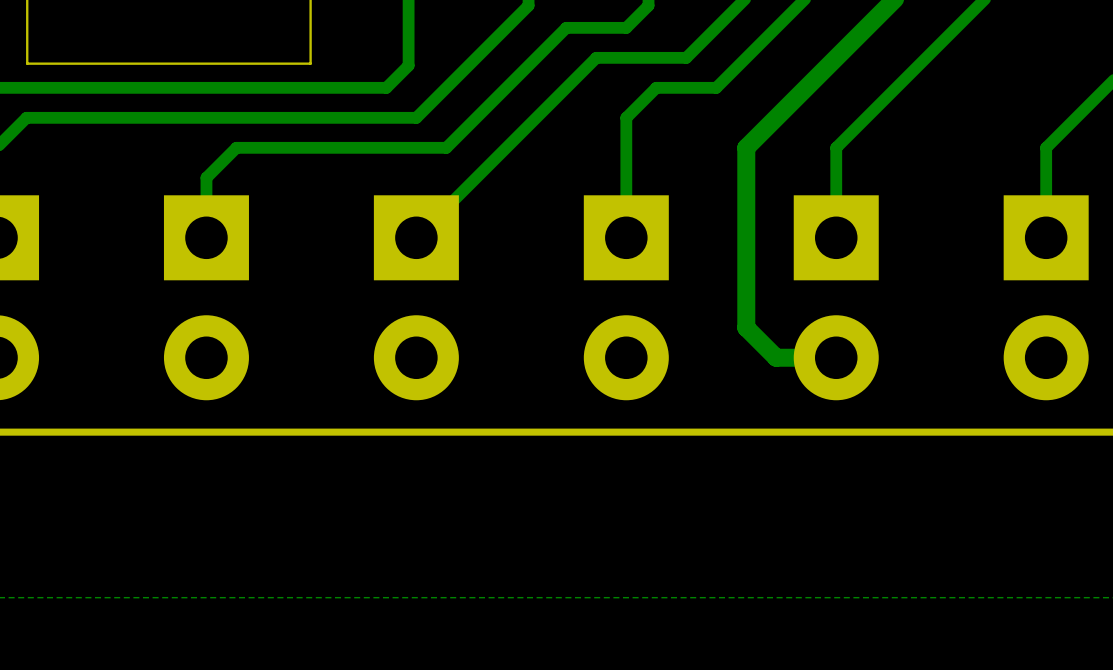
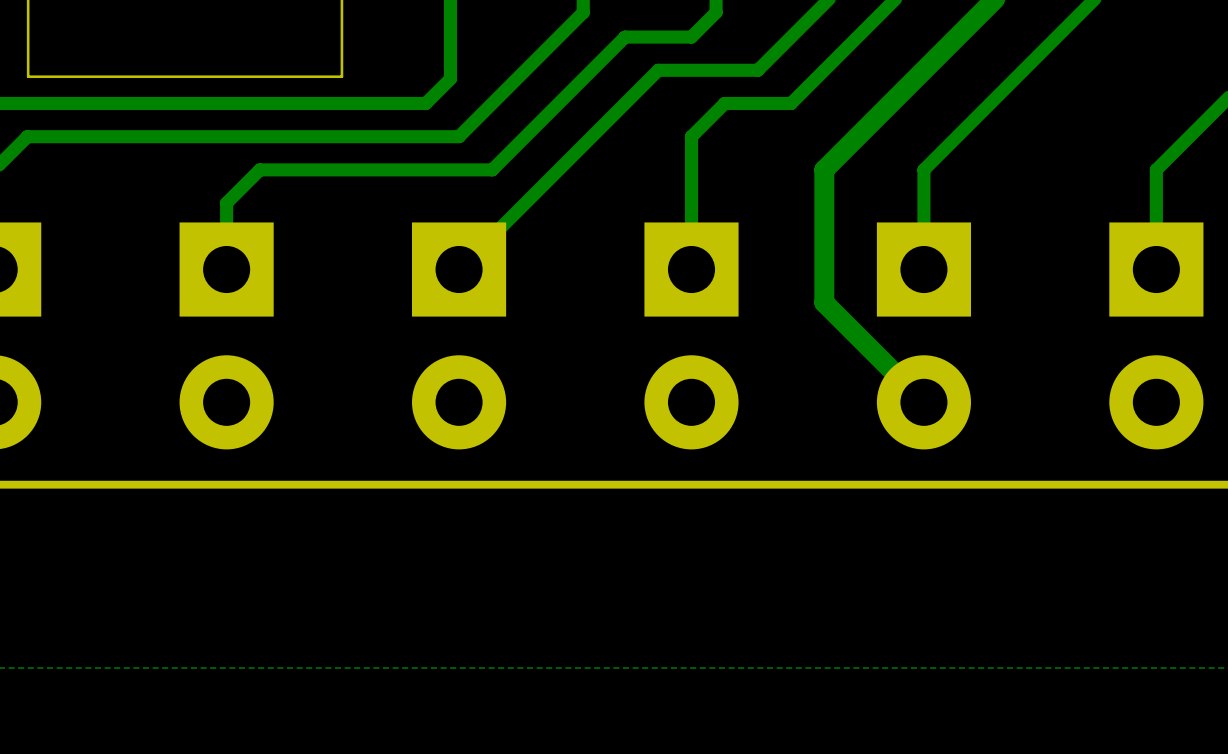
track: (746, 267) (746, 327) (776, 357) (836, 357) -> (824, 302) (923, 402)

